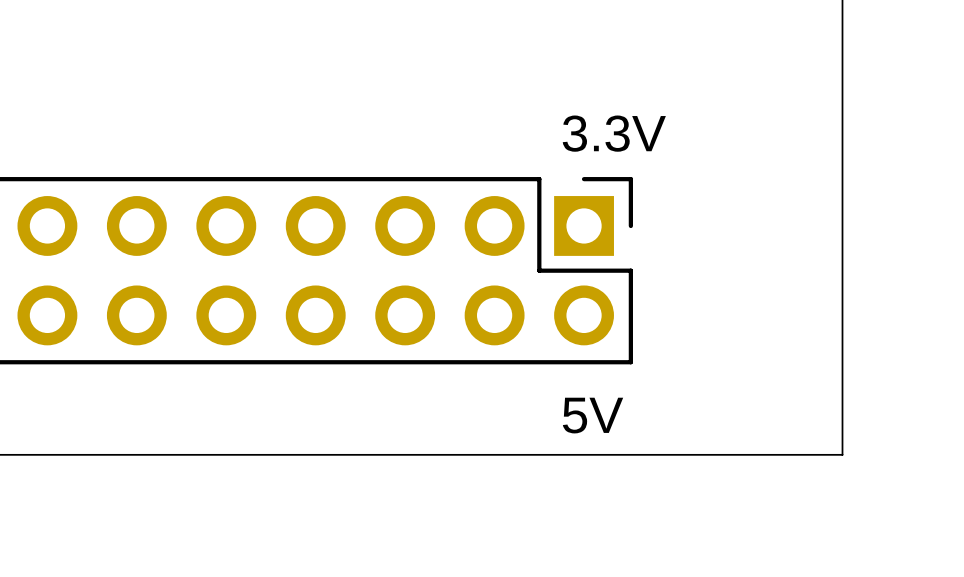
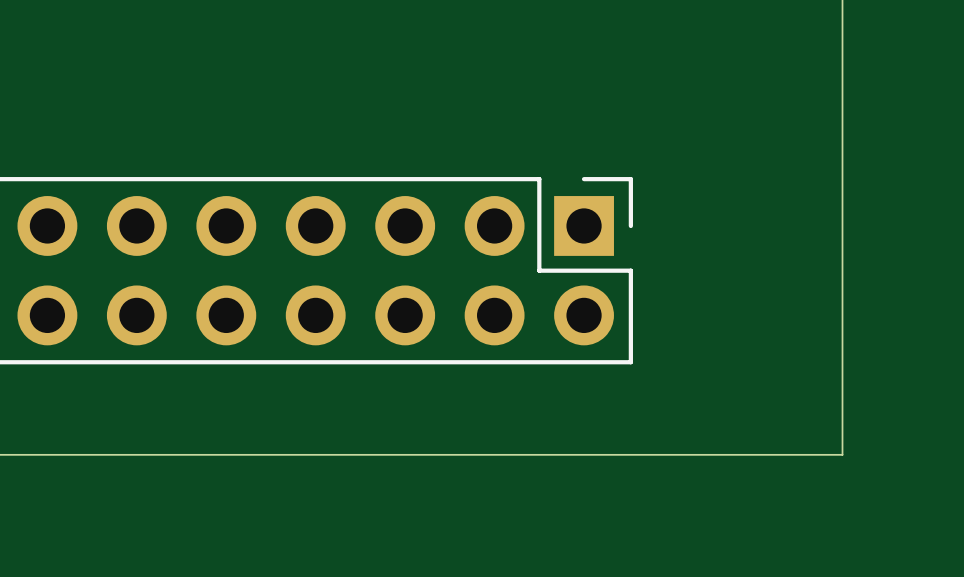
text: 3.3V (614, 133) -> none
text: 5V (593, 415) -> none

